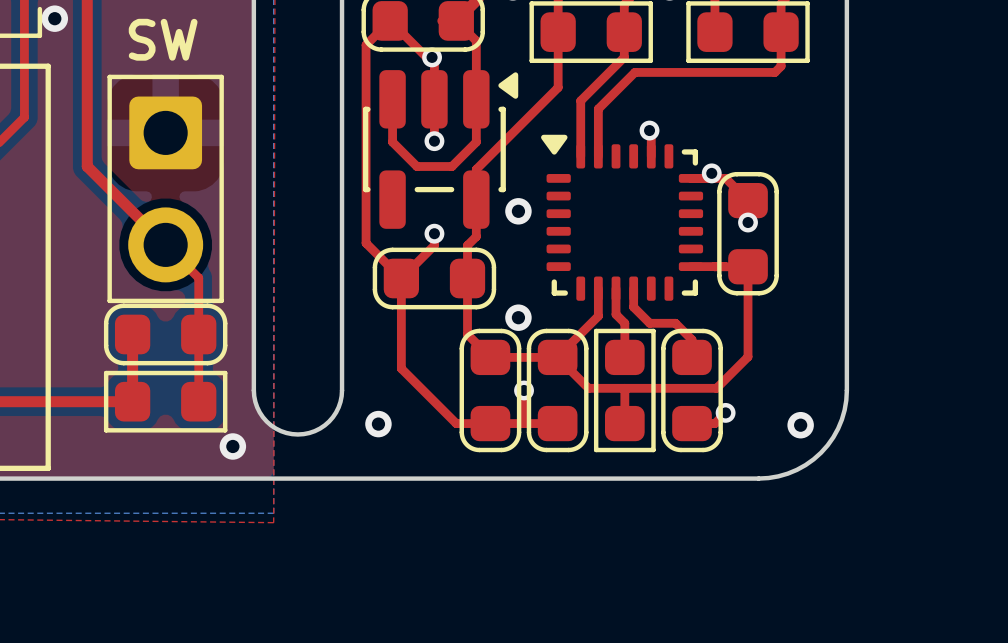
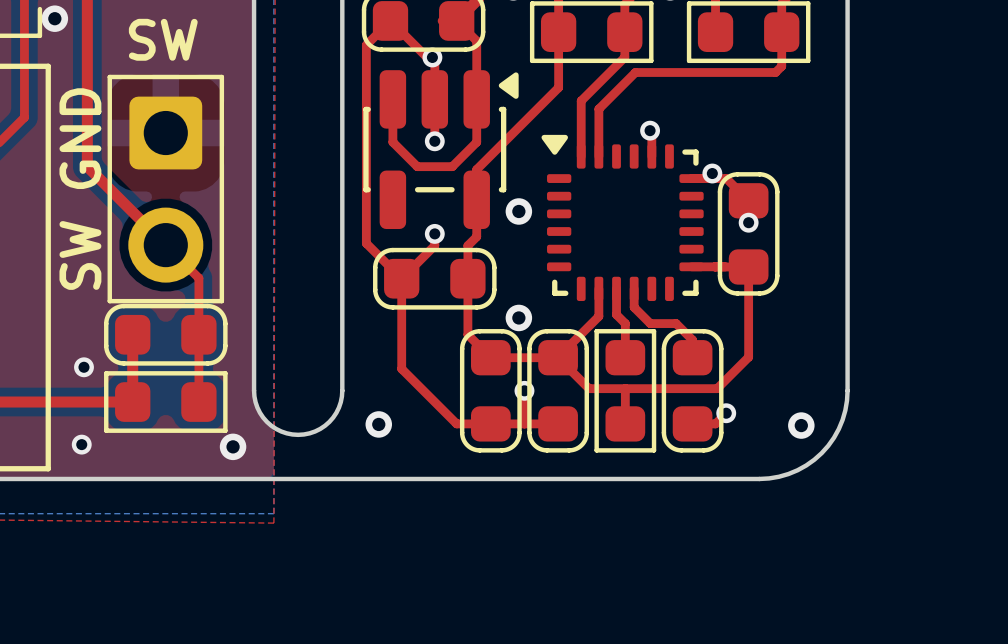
text: none -> SW GND (80, 189)
via: none -> (83, 367)
via: none -> (81, 444)

